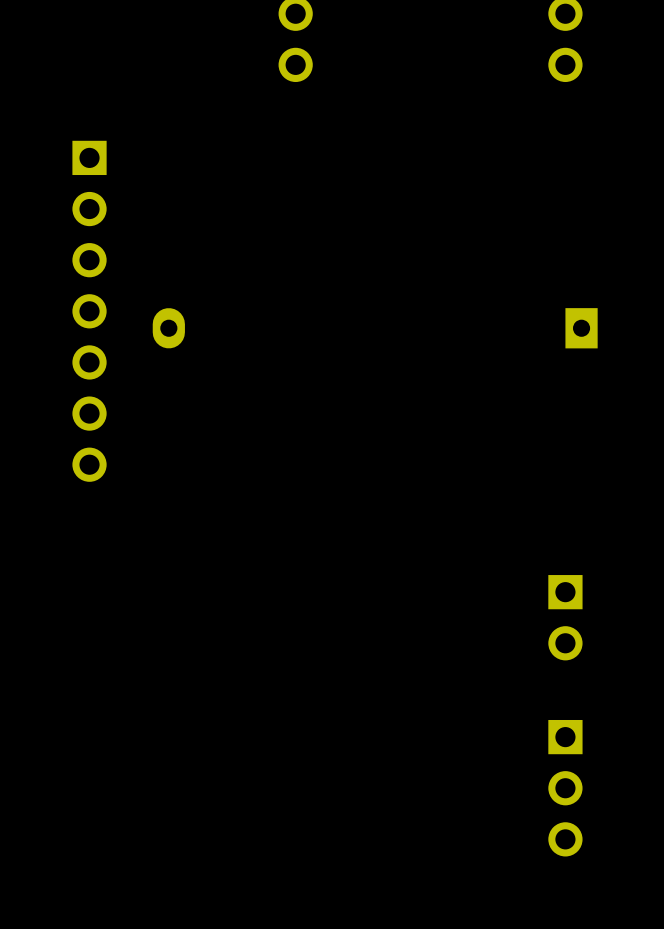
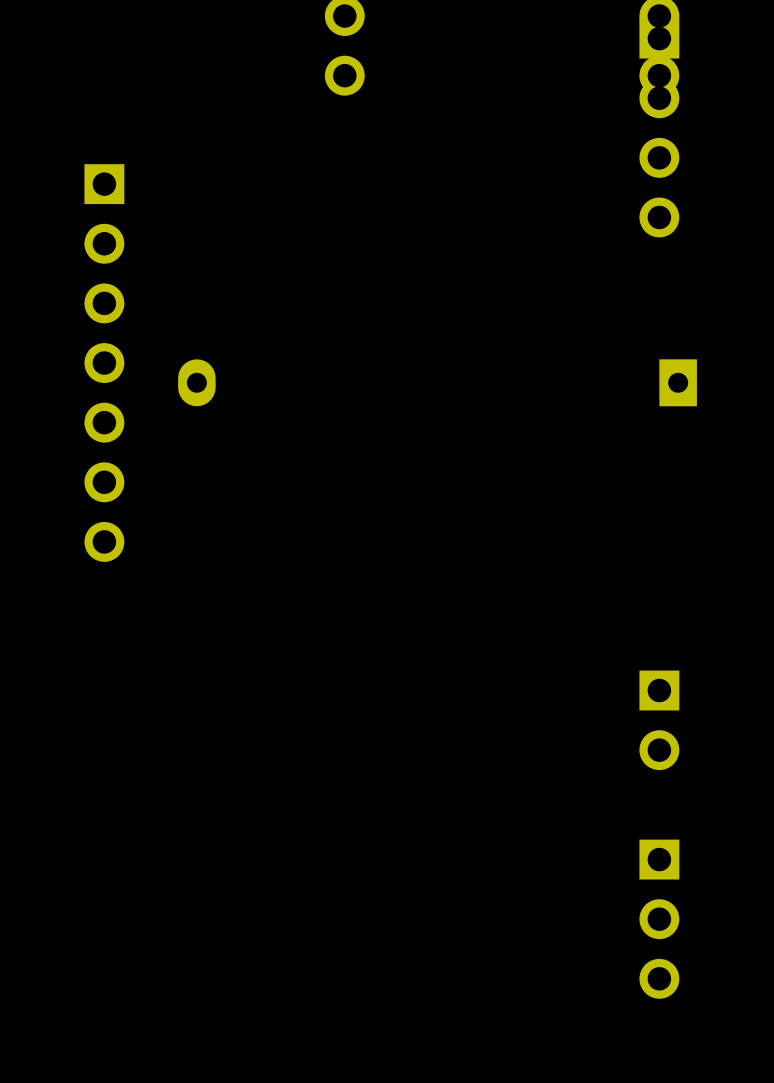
part: none -> (659, 128)

